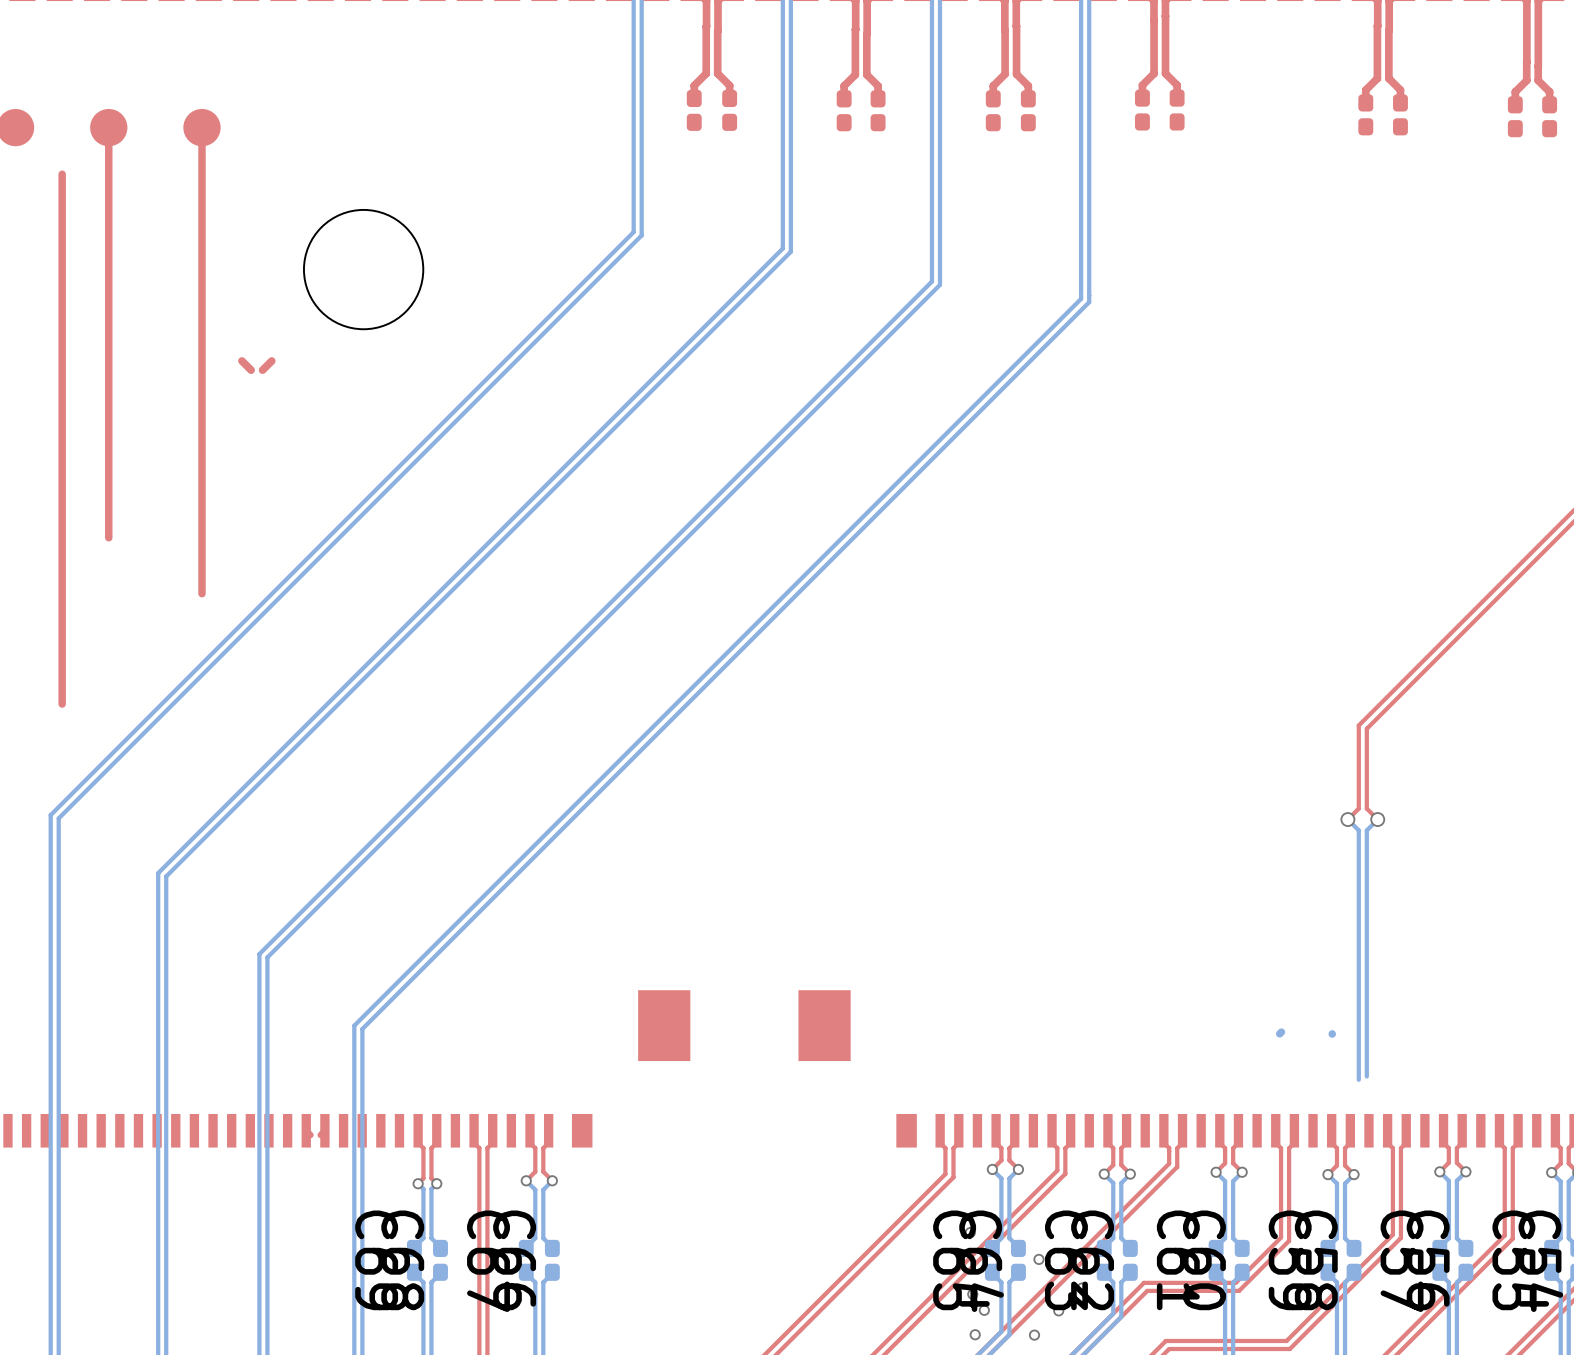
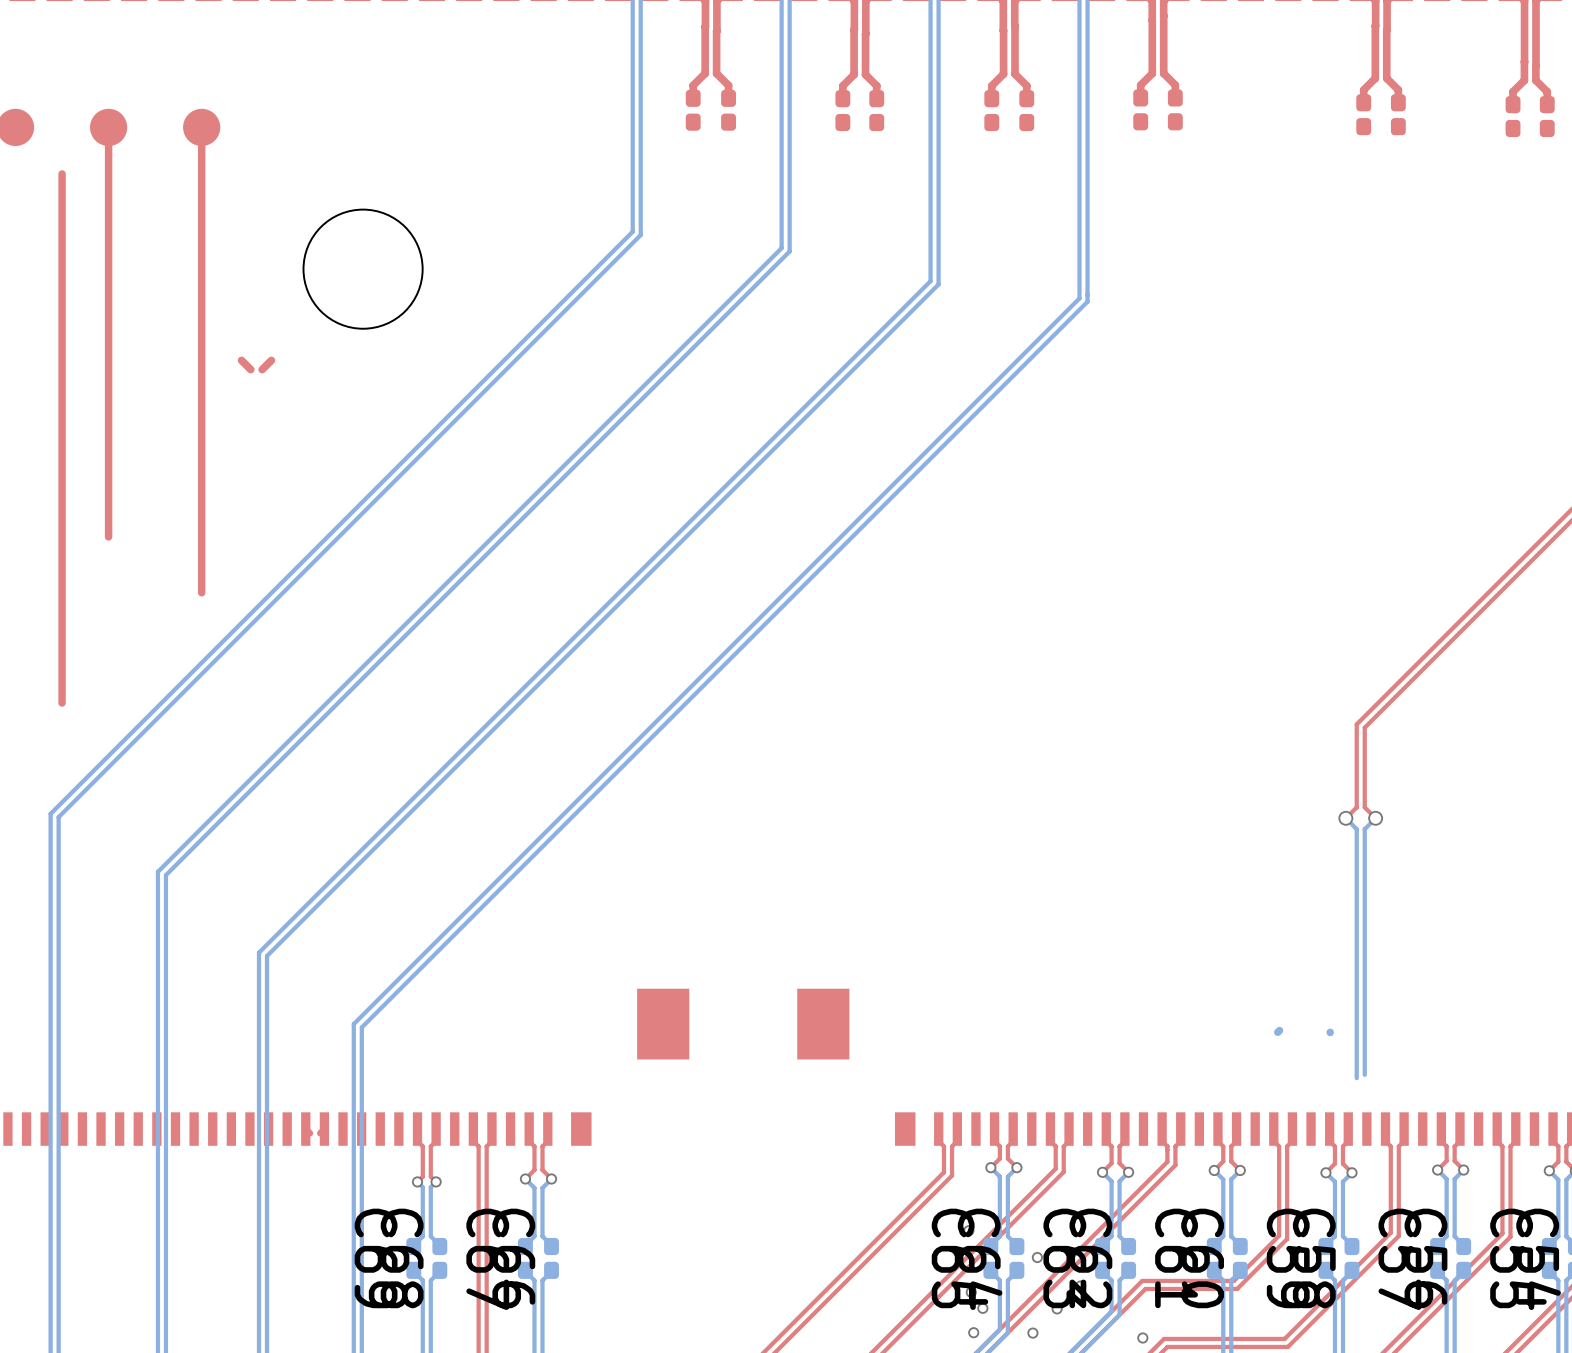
via: none -> (1142, 1338)

